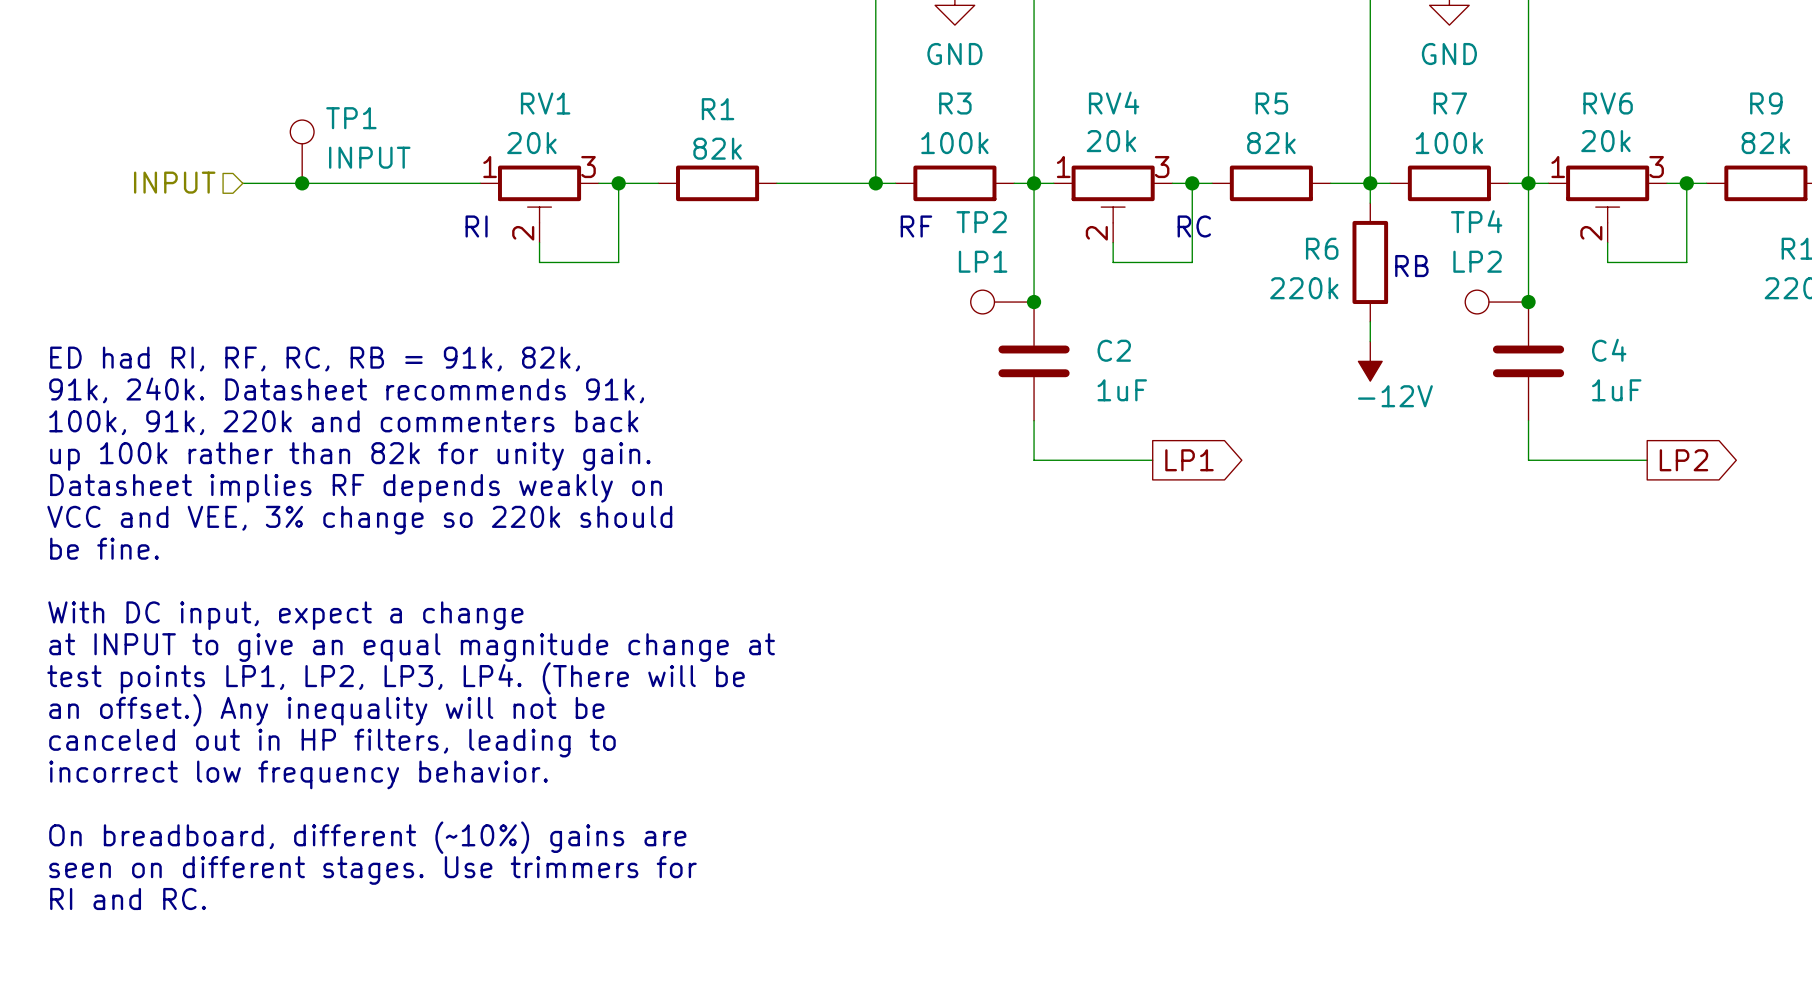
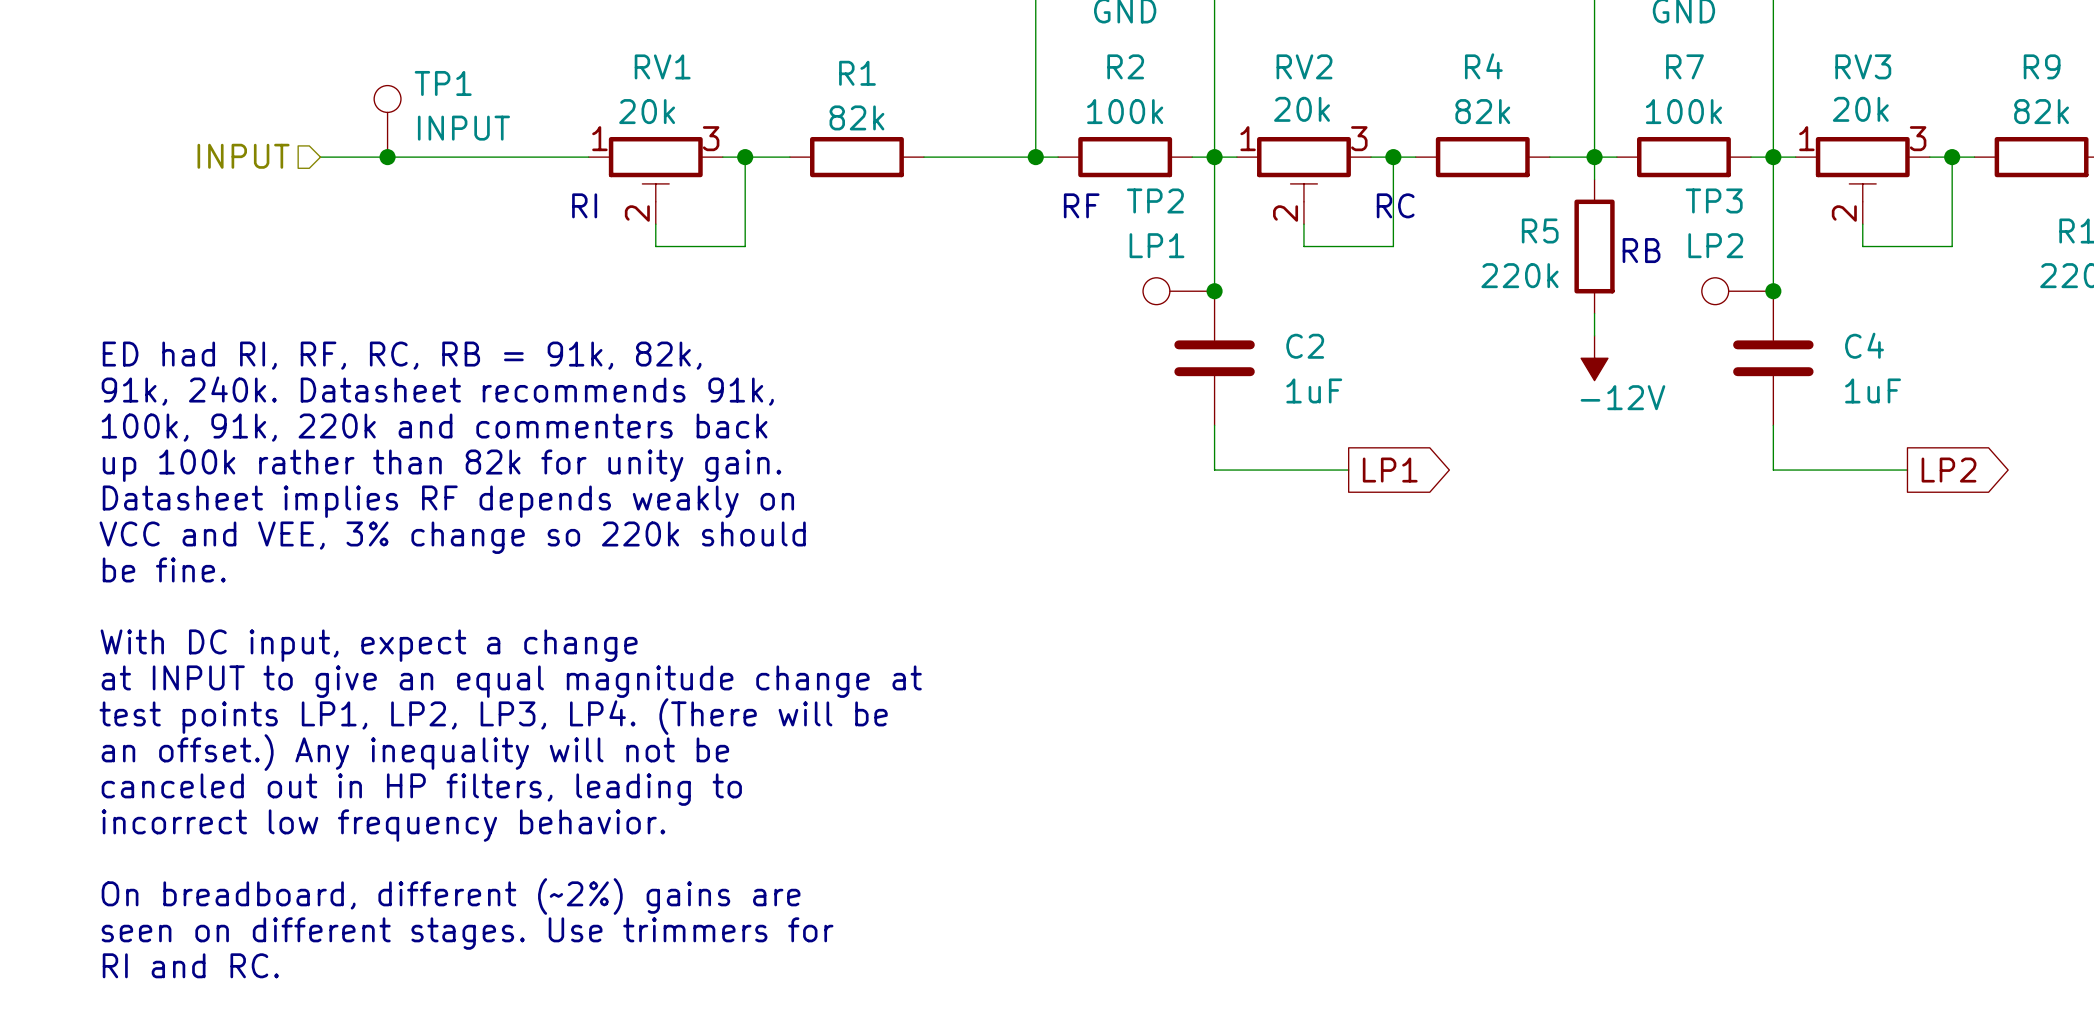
R3 name: R3 (955, 103) -> R2 (1125, 66)
RV4 name: RV4 (1114, 103) -> RV2 (1304, 66)
R5 name: R5 (1271, 103) -> R4 (1483, 66)
RV6 name: RV6 (1608, 103) -> RV3 (1863, 66)
TP4 name: TP4 (1476, 221) -> TP3 (1714, 200)
R6 name: R6 (1322, 248) -> R5 (1540, 230)
text: On breadboard, different (~10%) gains are (367, 837) -> On breadboard, different (~2%) gains are (451, 896)

